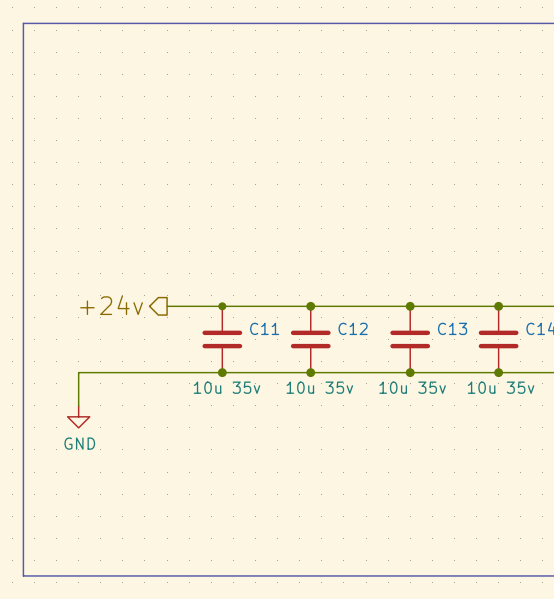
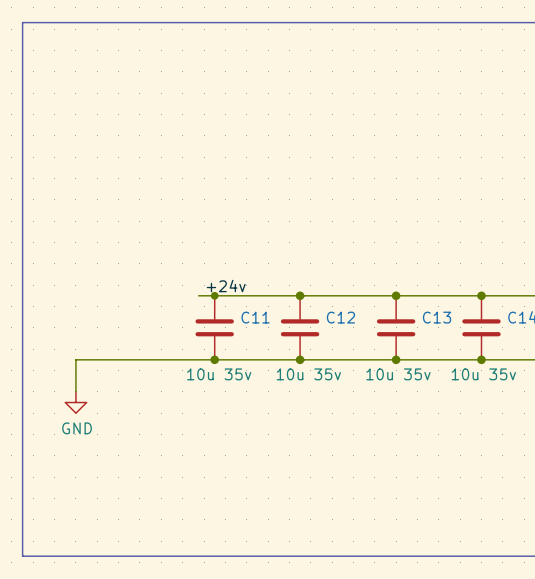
label: none -> +24v (226, 286)
hierarchical label: +24v (111, 305) -> none
wire: (167, 306) (205, 306) -> none

